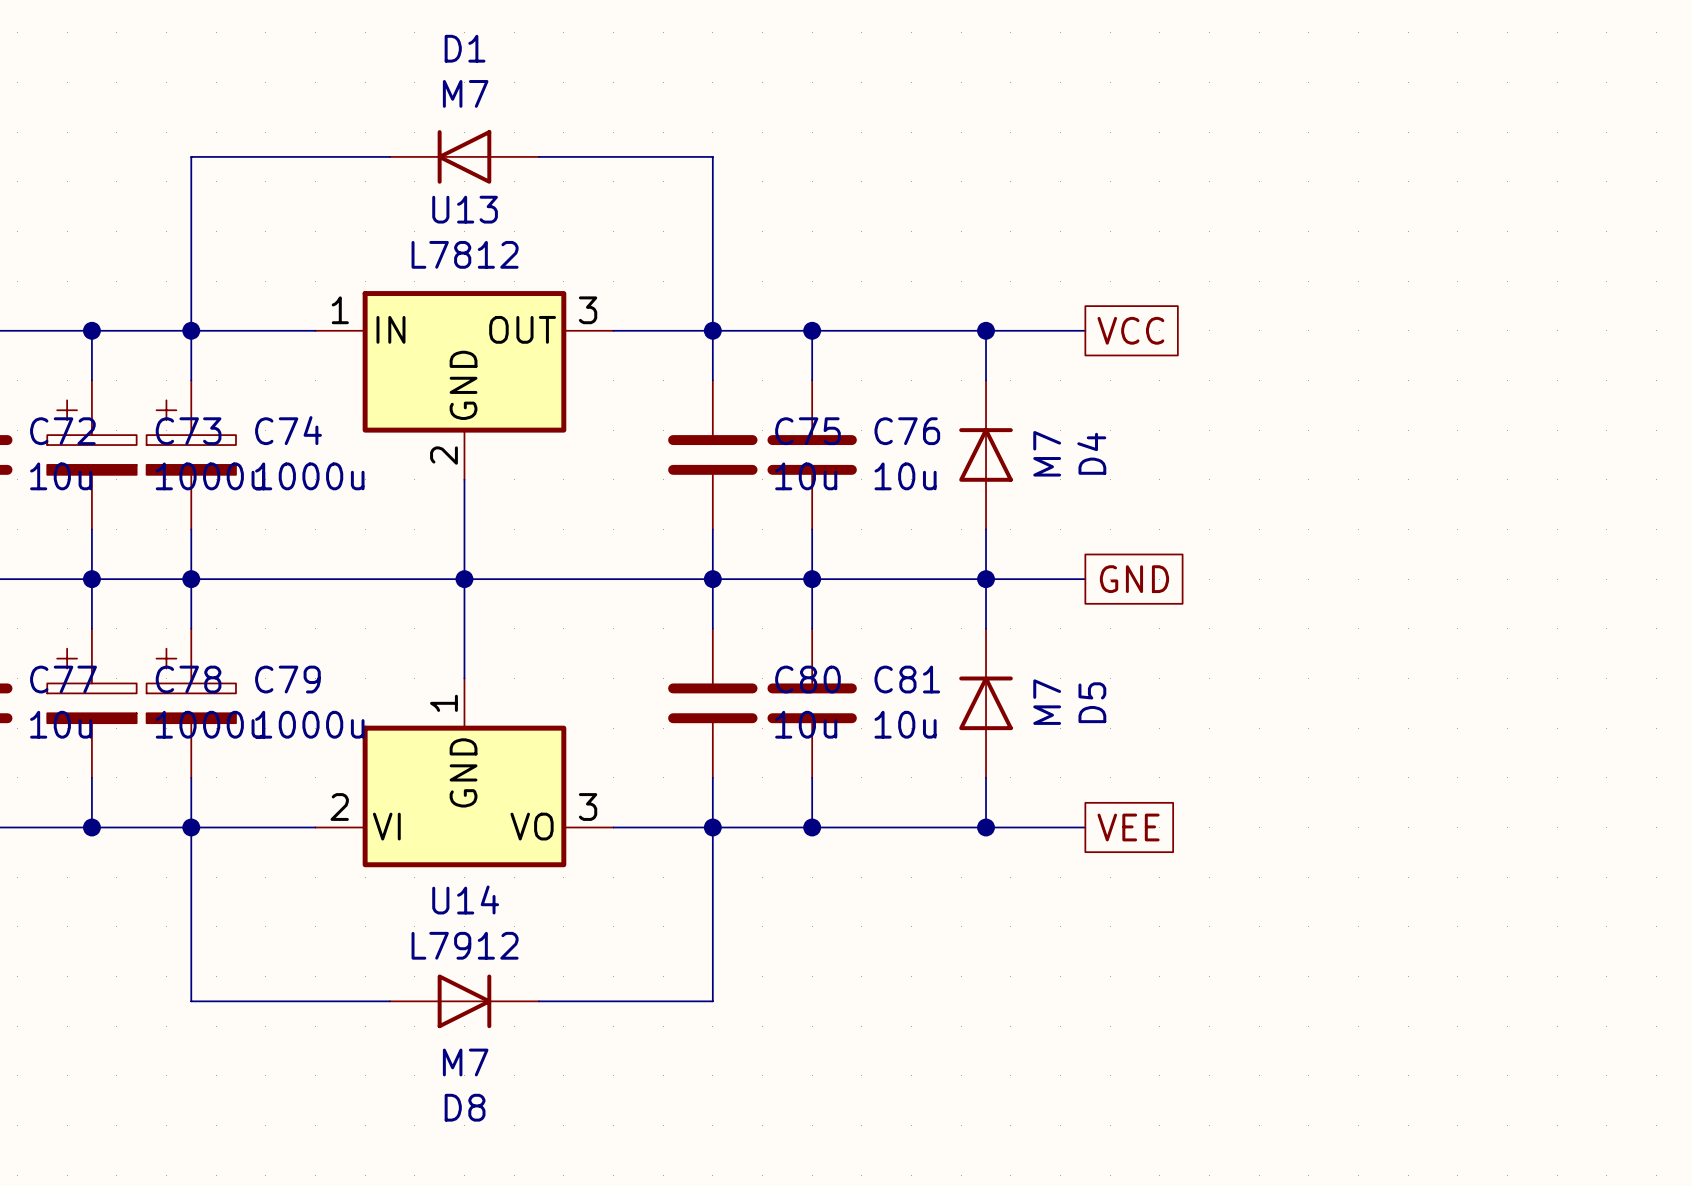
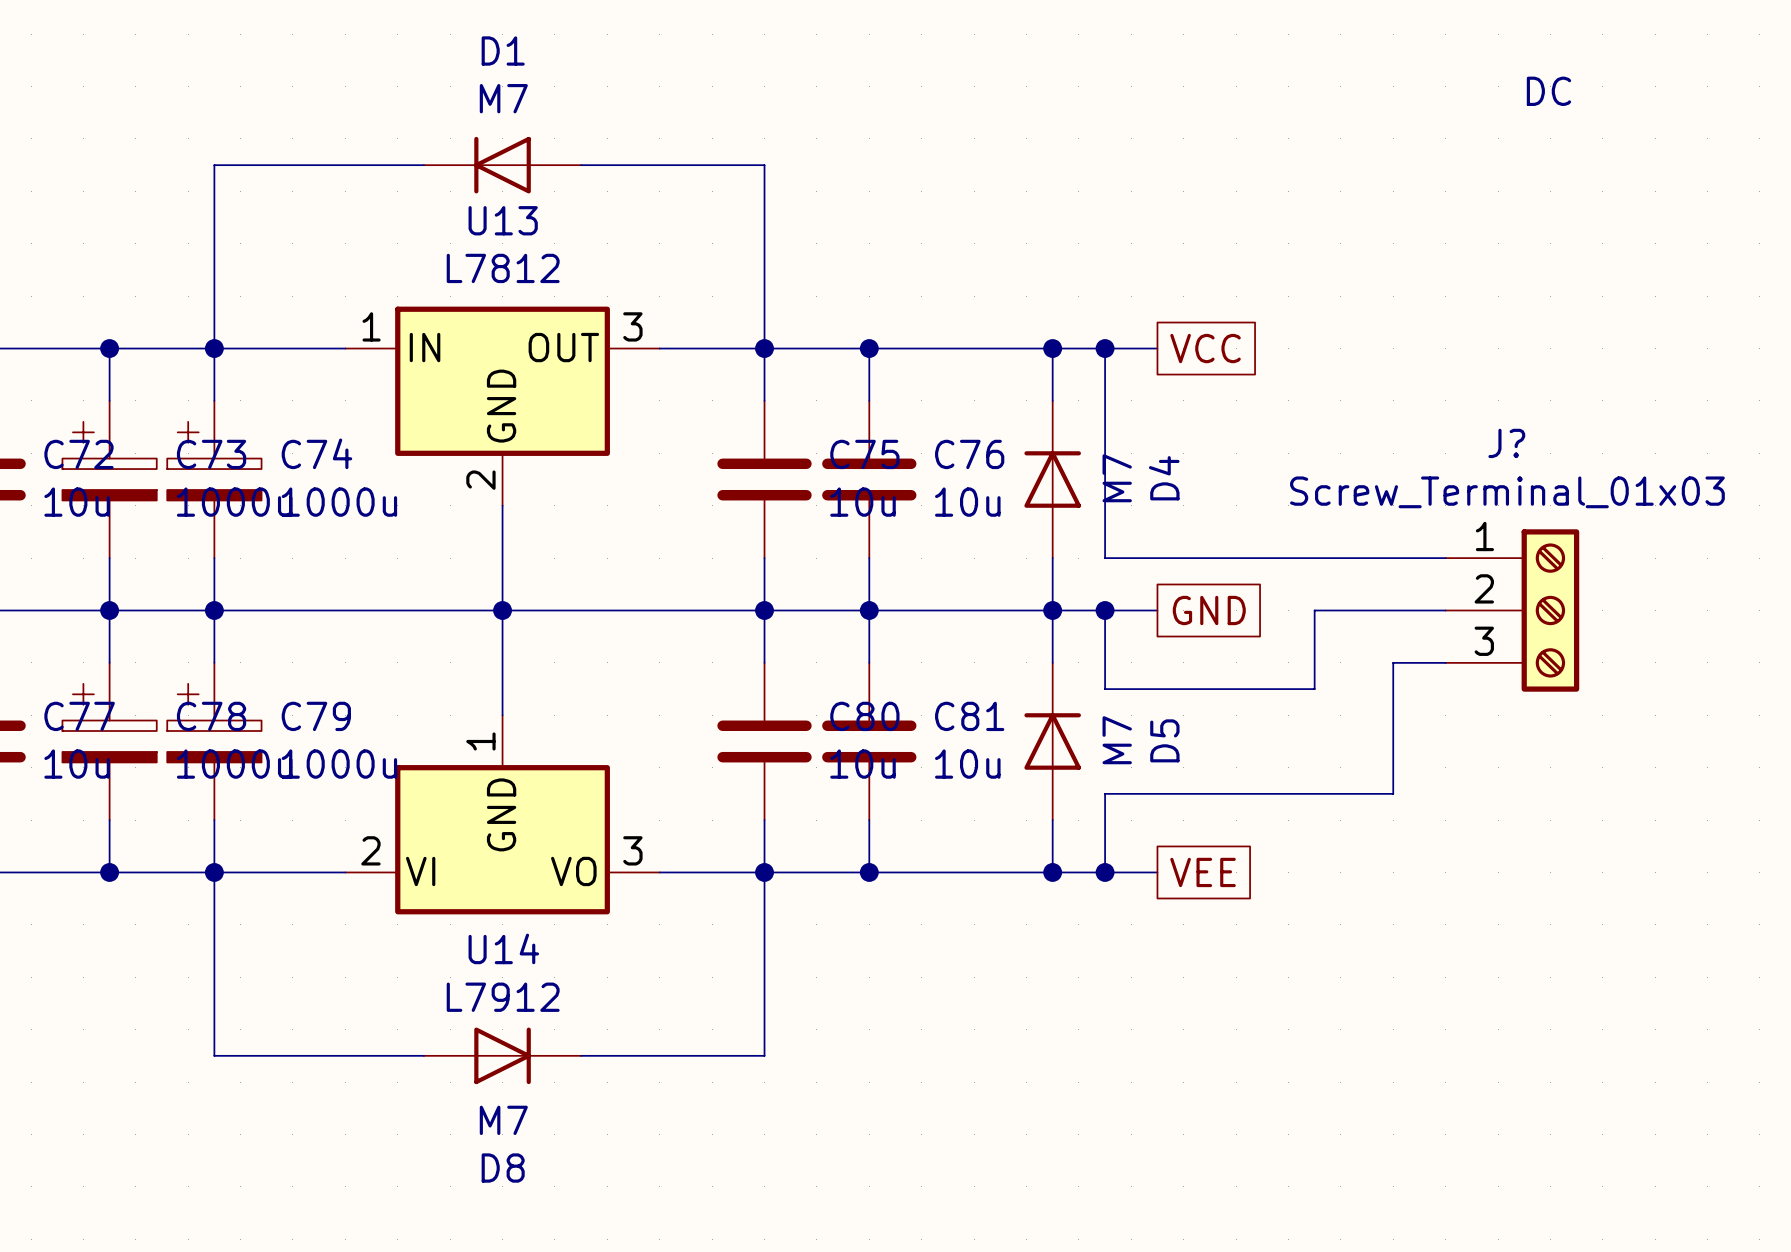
text: none -> DC (1548, 91)
wire: none -> (1105, 348) (1105, 558) (1445, 558)
junction: none -> (1105, 348)
wire: none -> (1105, 610) (1105, 689) (1314, 689) (1314, 610) (1445, 610)
junction: none -> (1105, 610)
J?: none -> Screw_Terminal_01x03 (1512, 610)
wire: none -> (1445, 662) (1393, 662) (1393, 793) (1105, 793) (1105, 872)
junction: none -> (1105, 872)

